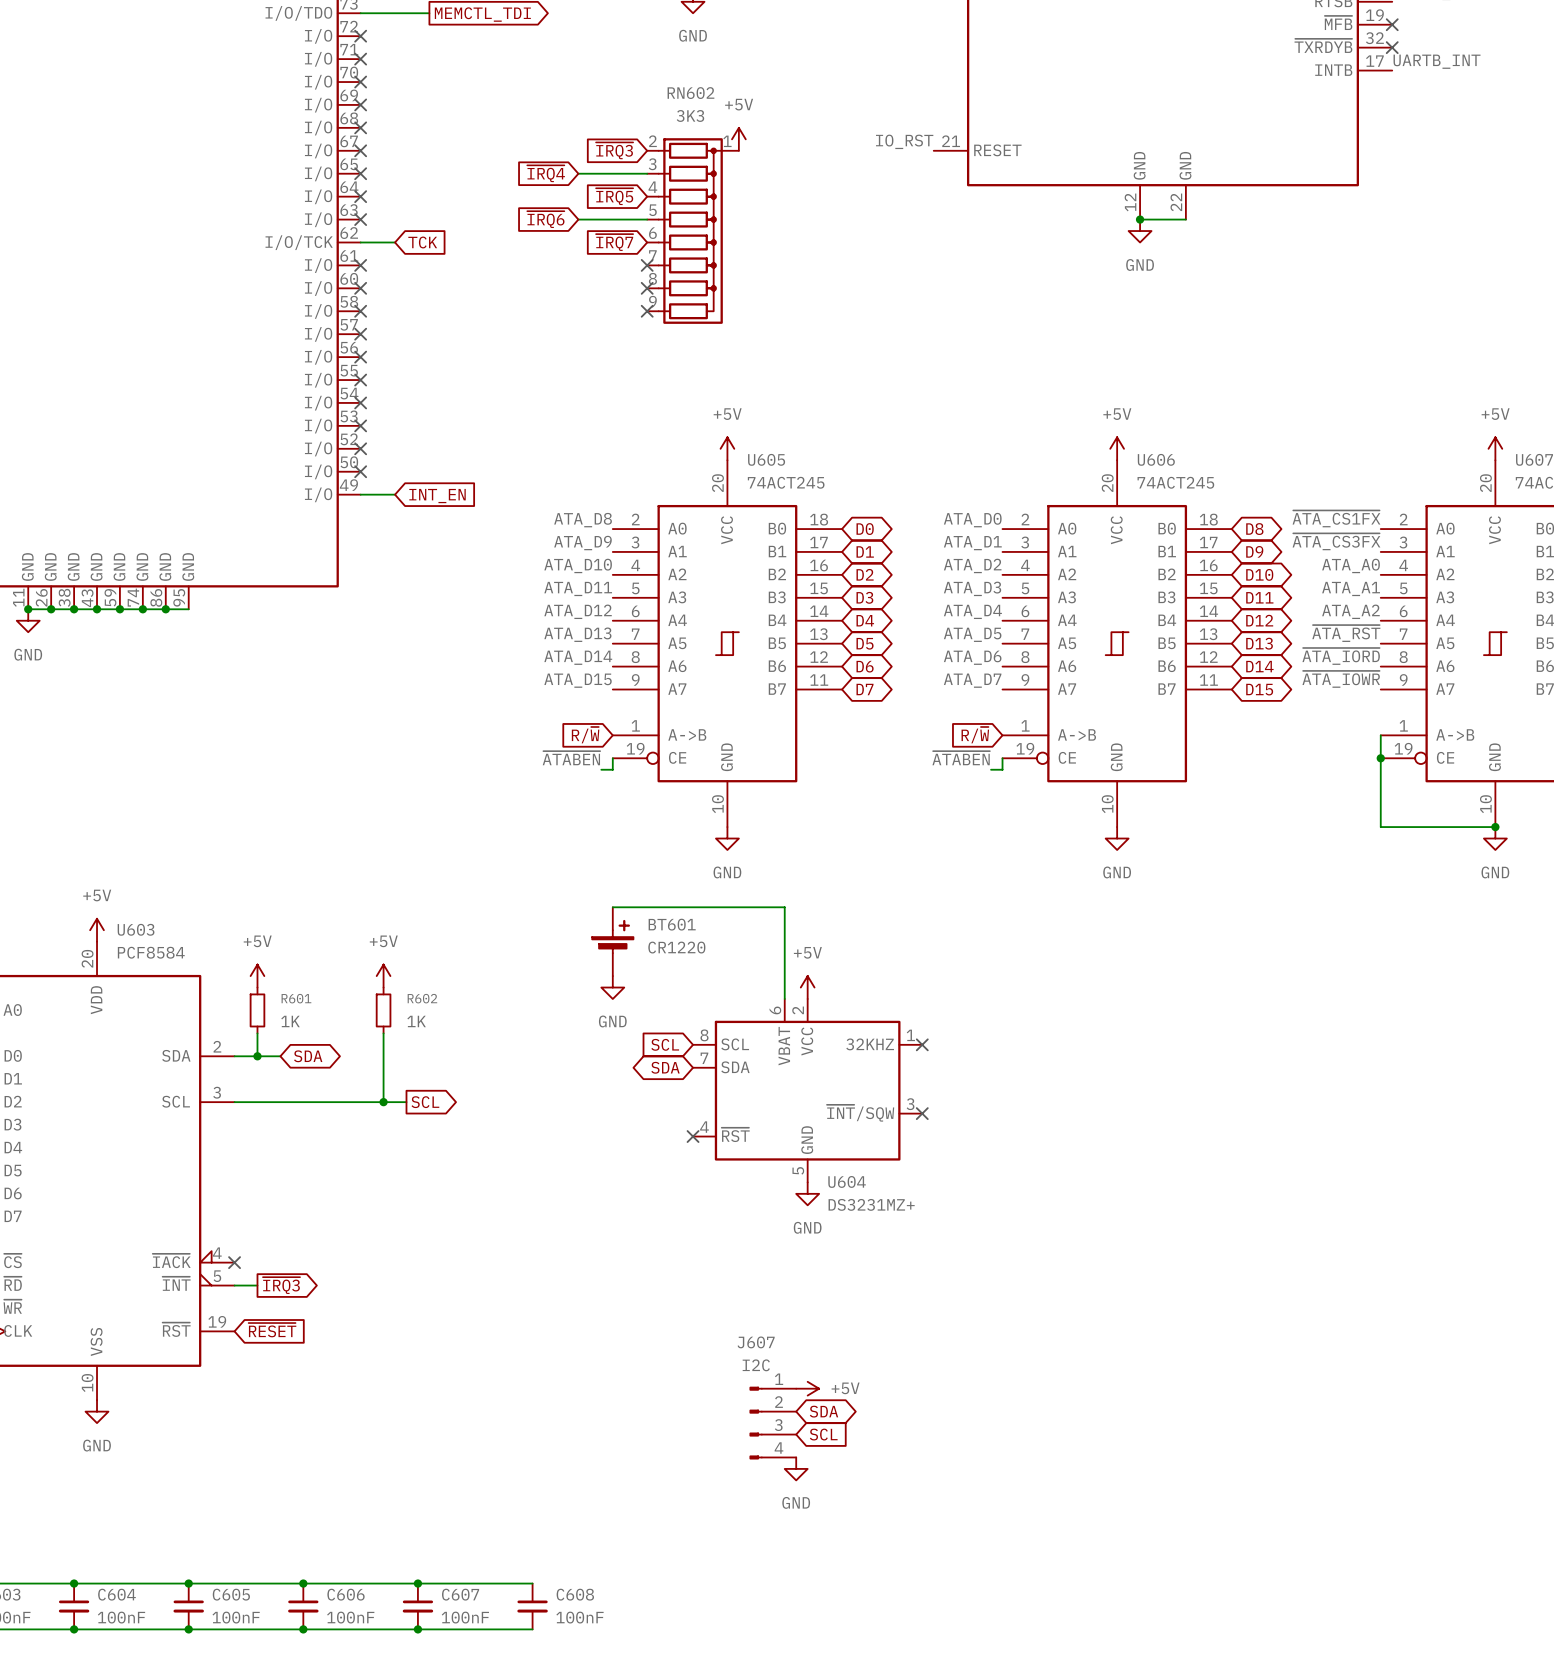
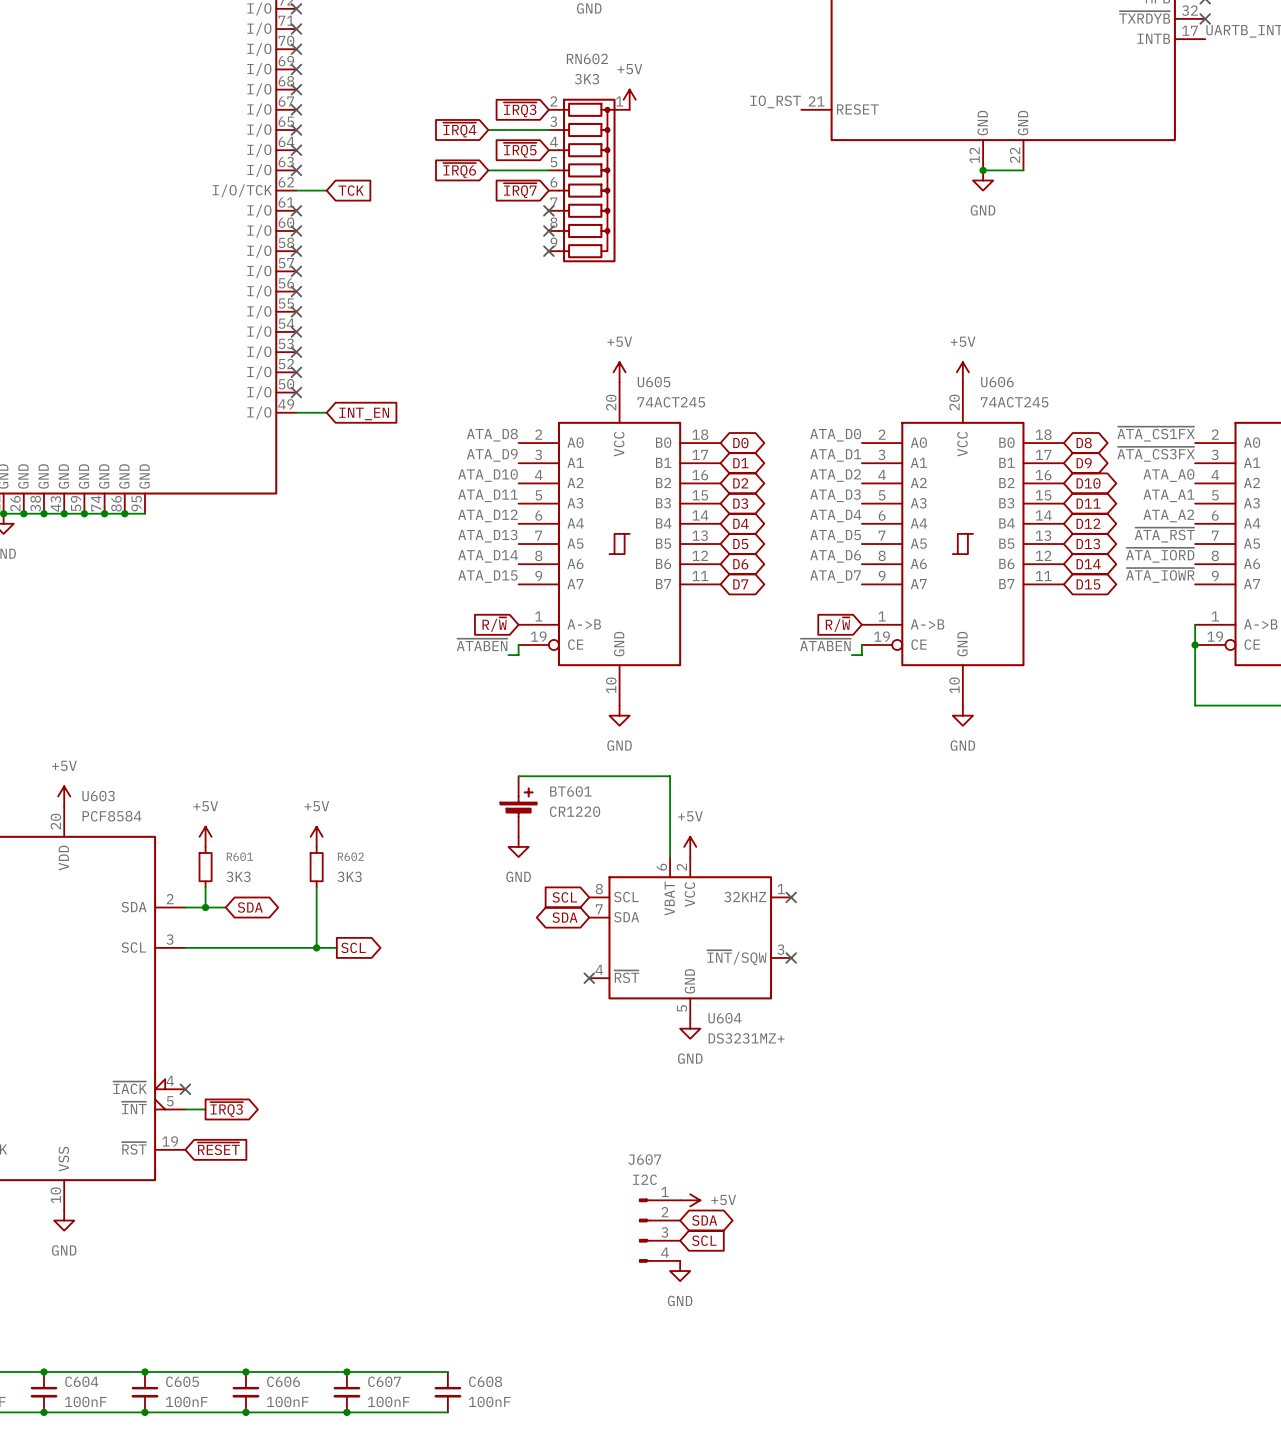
R601 value: 1K (290, 1021) -> 3K3 (238, 876)
R602 value: 1K (416, 1021) -> 3K3 (349, 876)

